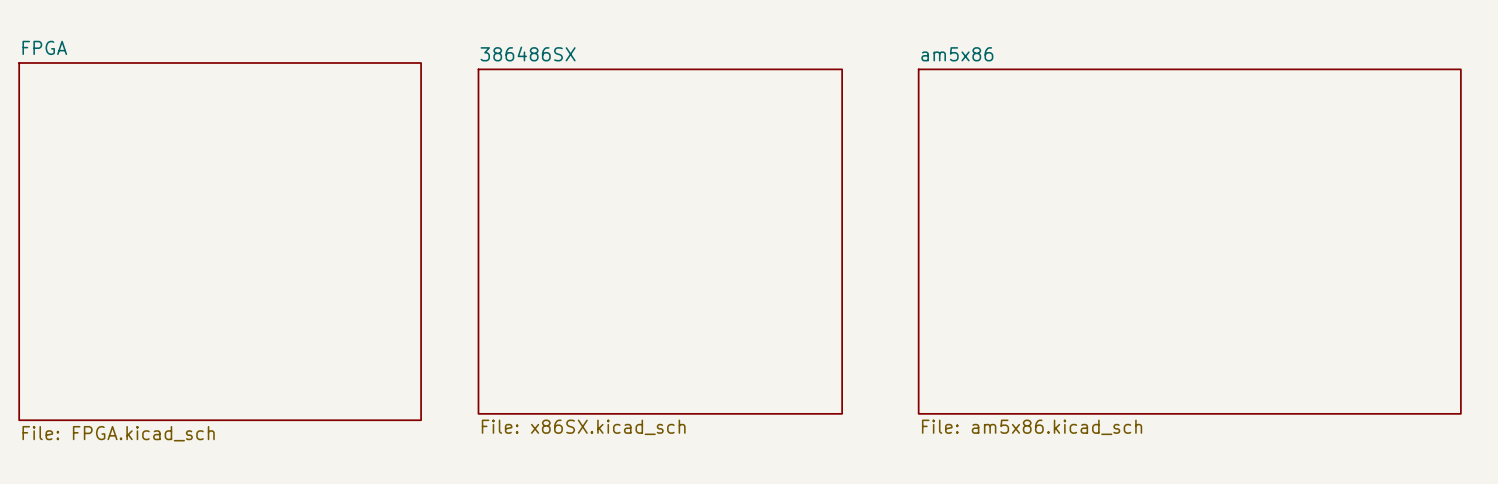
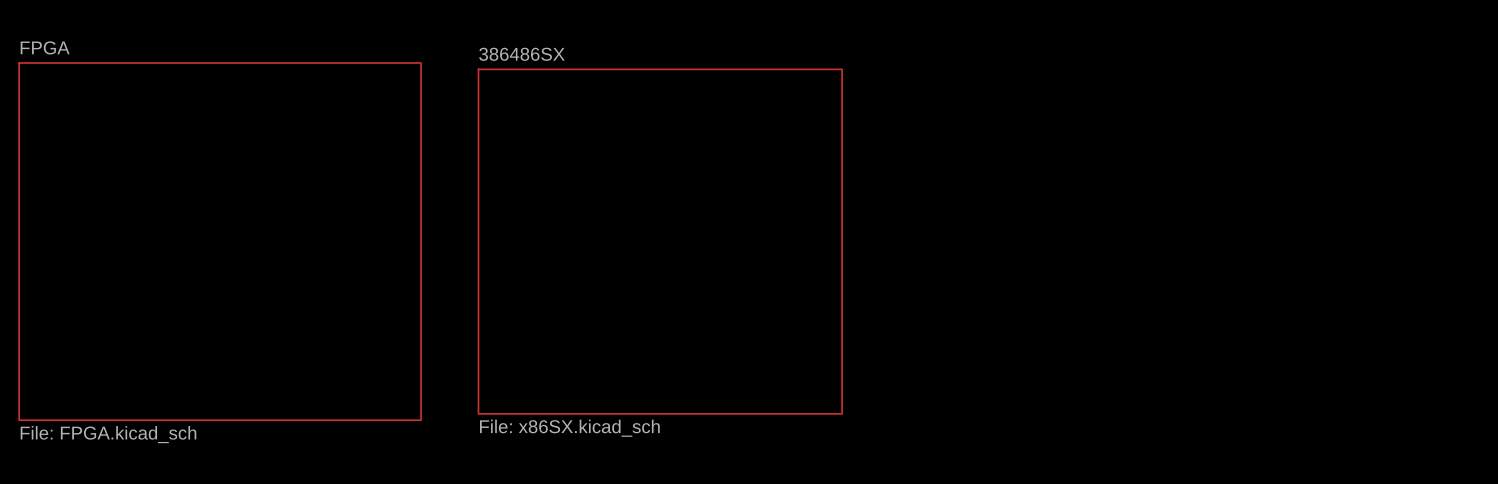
sheet am5x86: File: am5x86.kicad_sch (1189, 241) -> none

